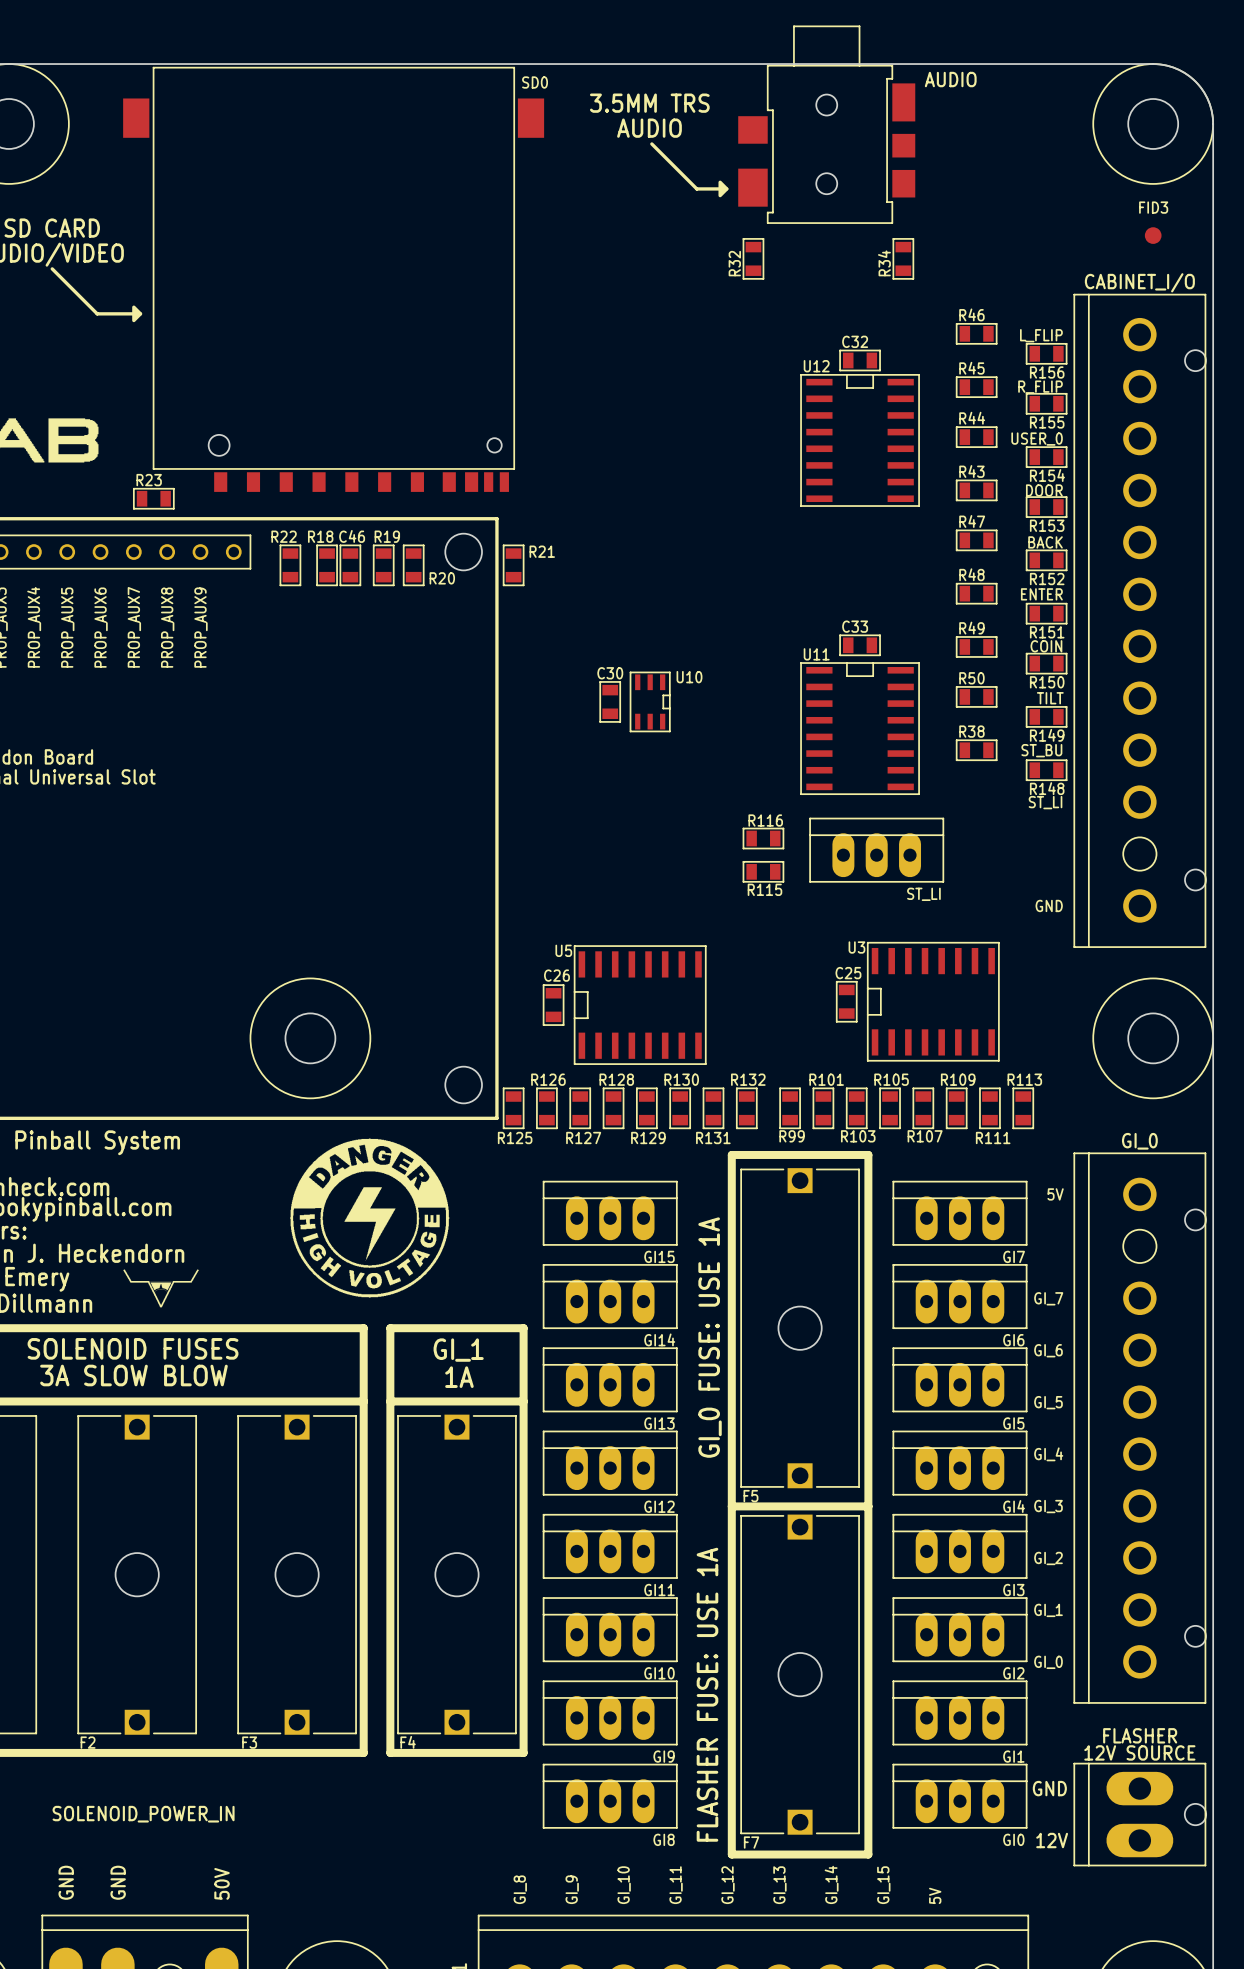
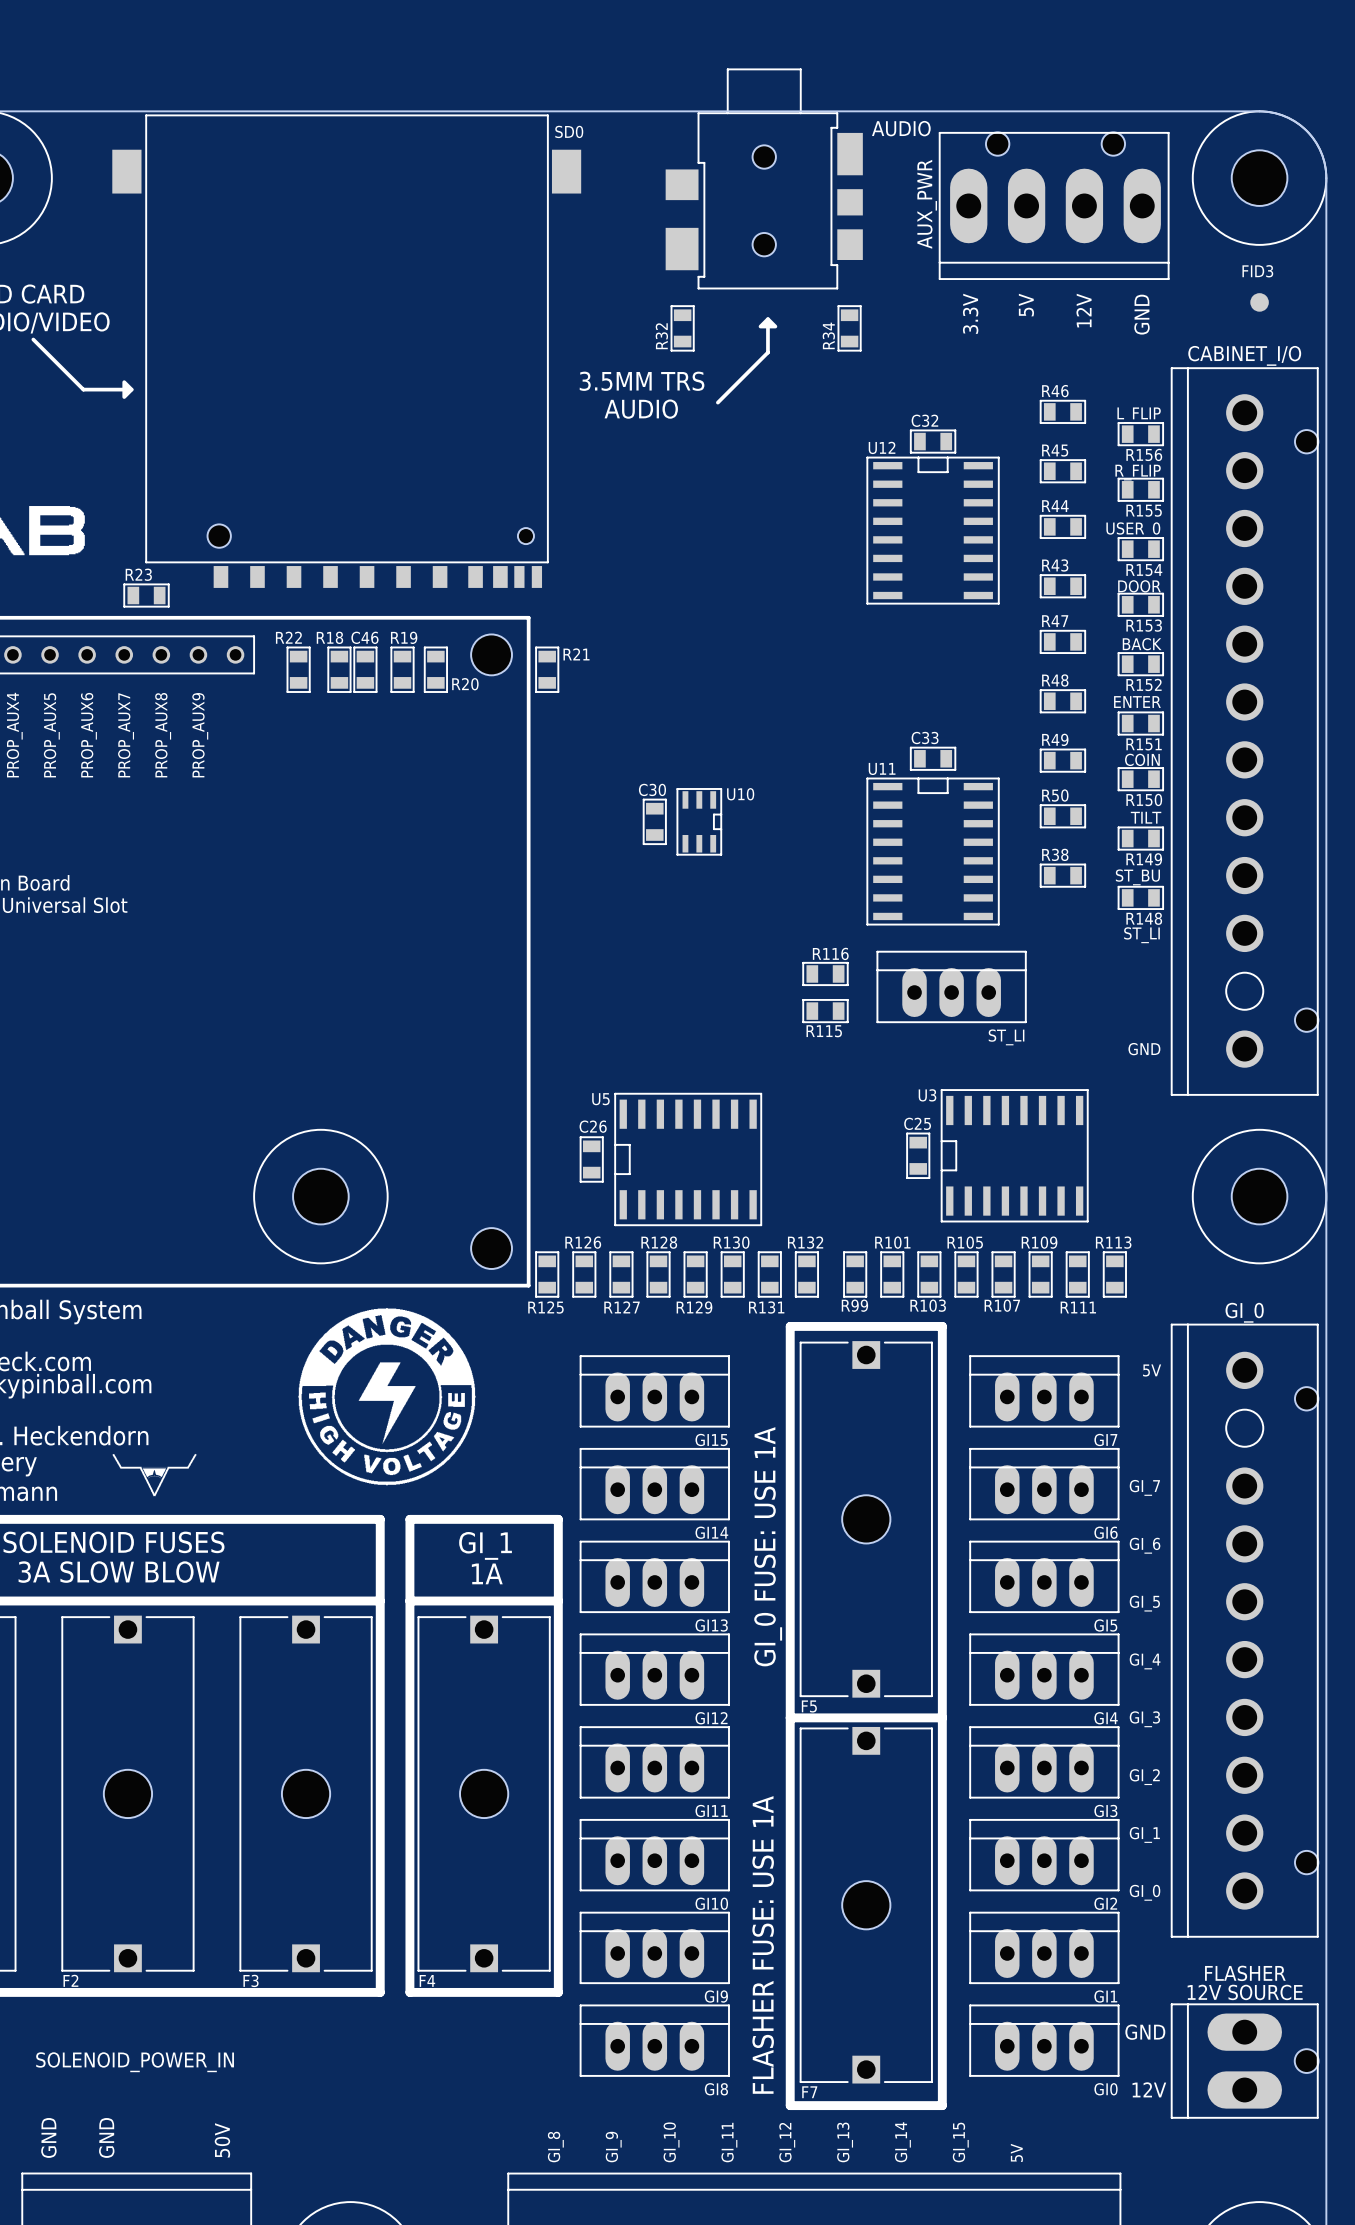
text position: 3.5MM TRS (649, 103) -> 3.5MM TRS (642, 381)
AUDIO position: (826, 124) -> (764, 178)
text position: AUDIO (649, 128) -> AUDIO (641, 409)
line: (651, 143) (696, 188) (726, 188) -> none
AUX_PWR: none -> (1054, 205)
drawing: [718, 180, 729, 198] -> none
drawing: none -> [758, 317, 778, 329]
line: none -> (767, 319) (767, 352) (717, 402)
R32 position: (753, 258) -> (682, 328)
R34 position: (903, 258) -> (849, 328)

